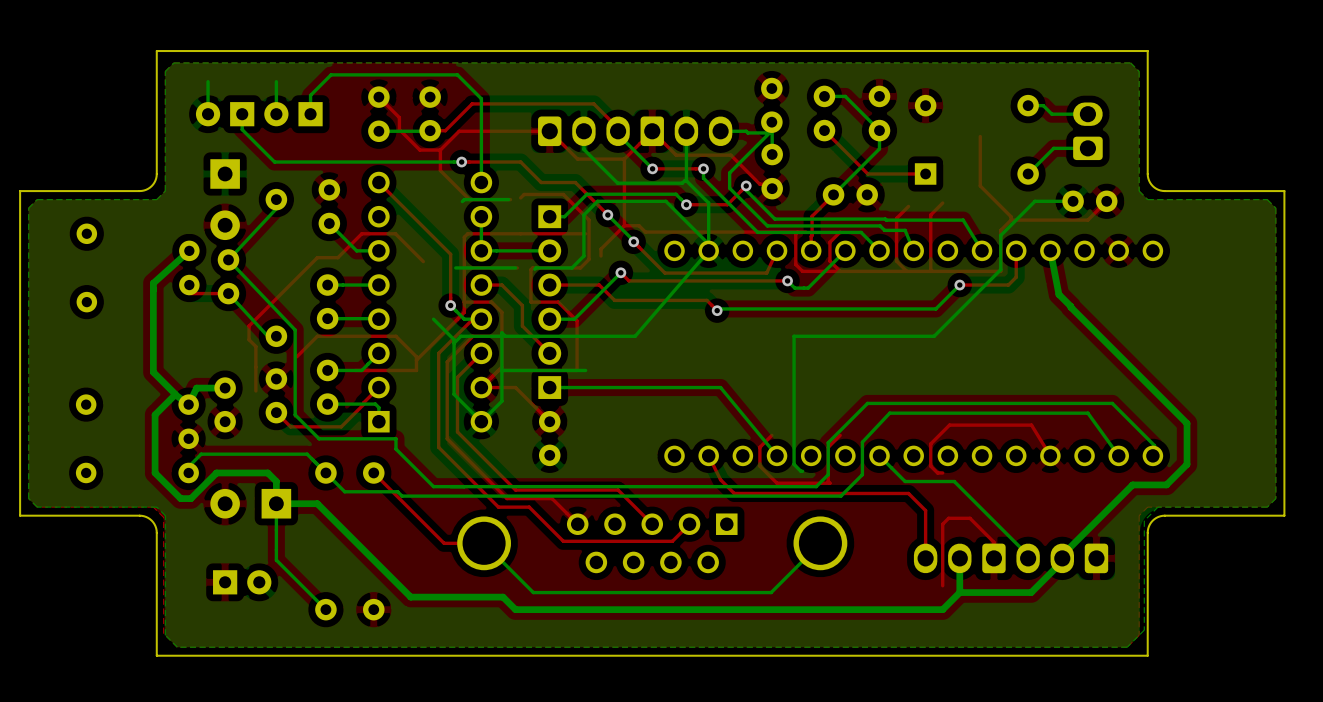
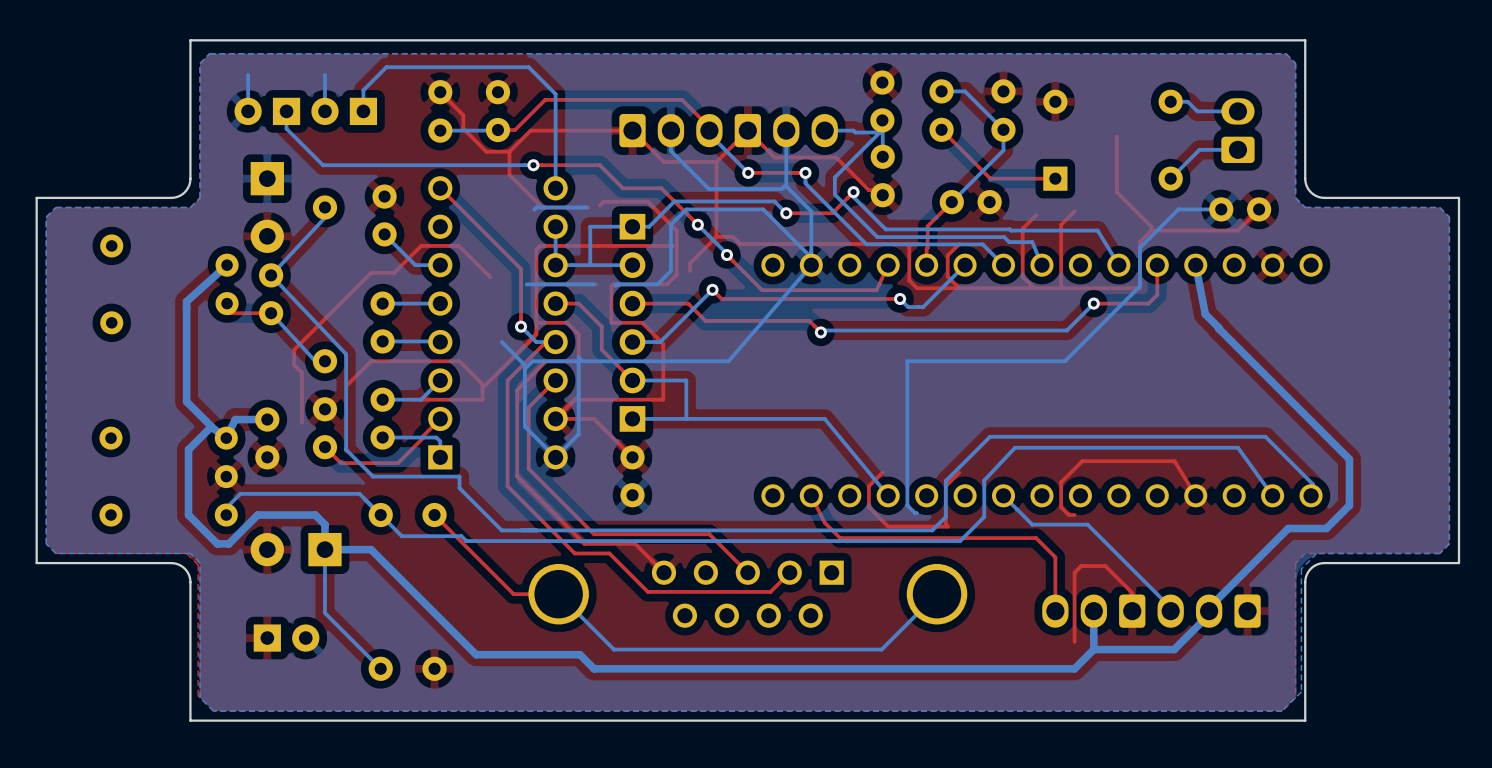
bottom track: none -> (632, 226) (590, 226) (590, 265)
bottom track: none -> (632, 380) (686, 380) (686, 418)
bottom track: (585, 370) (501, 370) -> none

